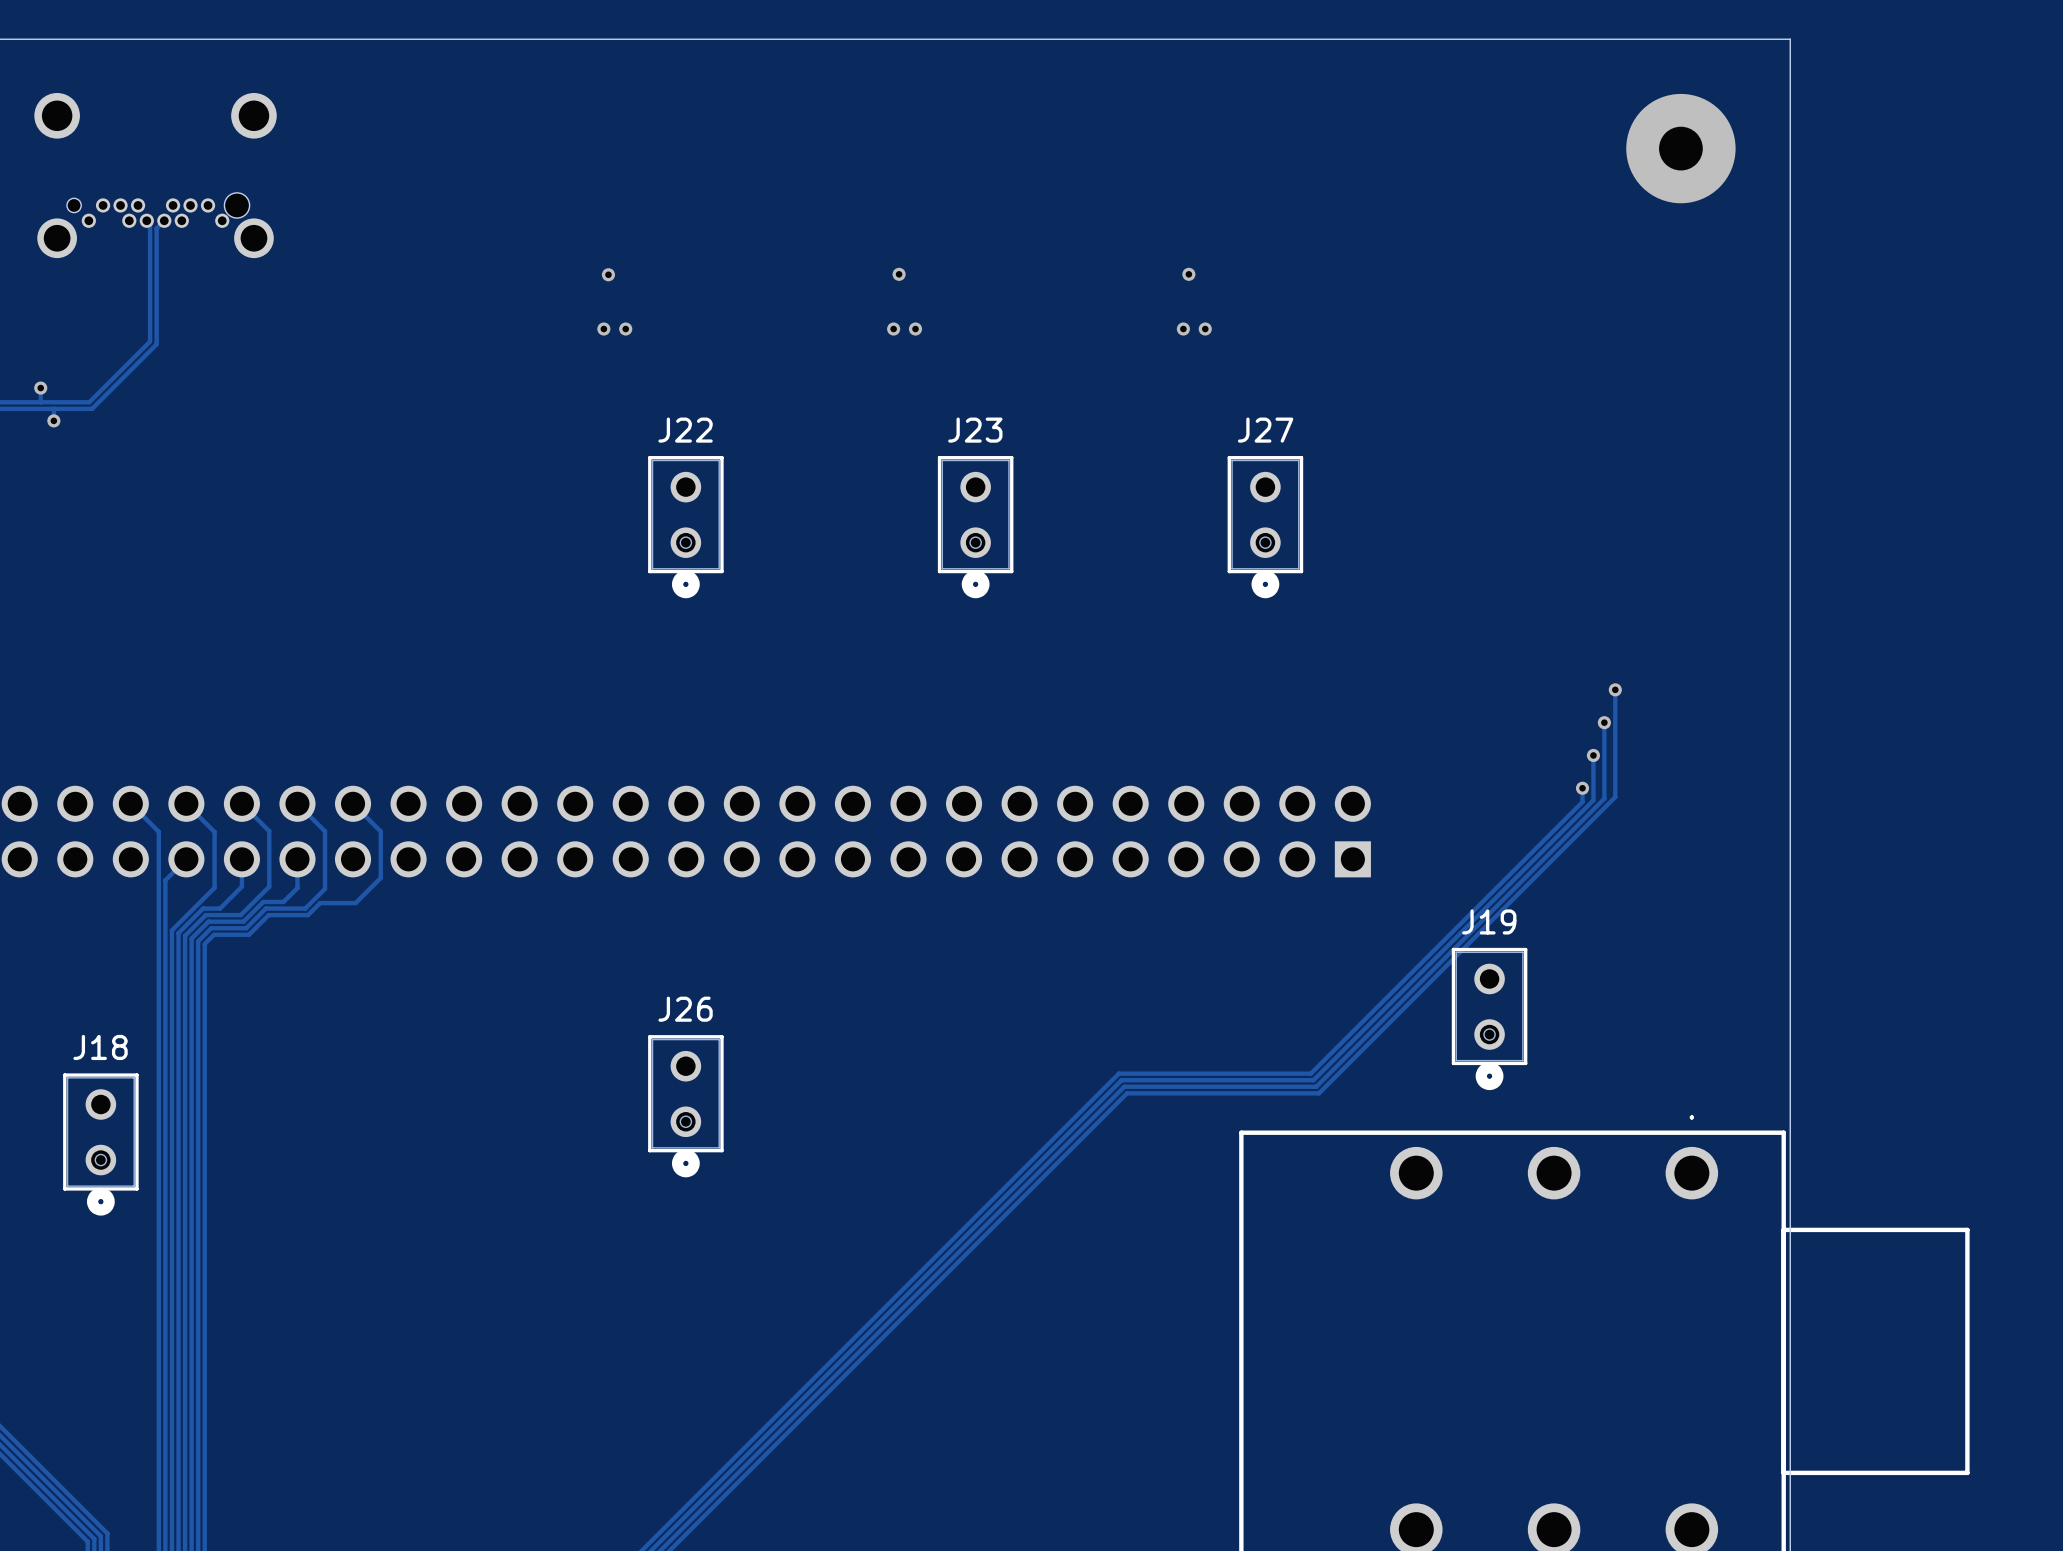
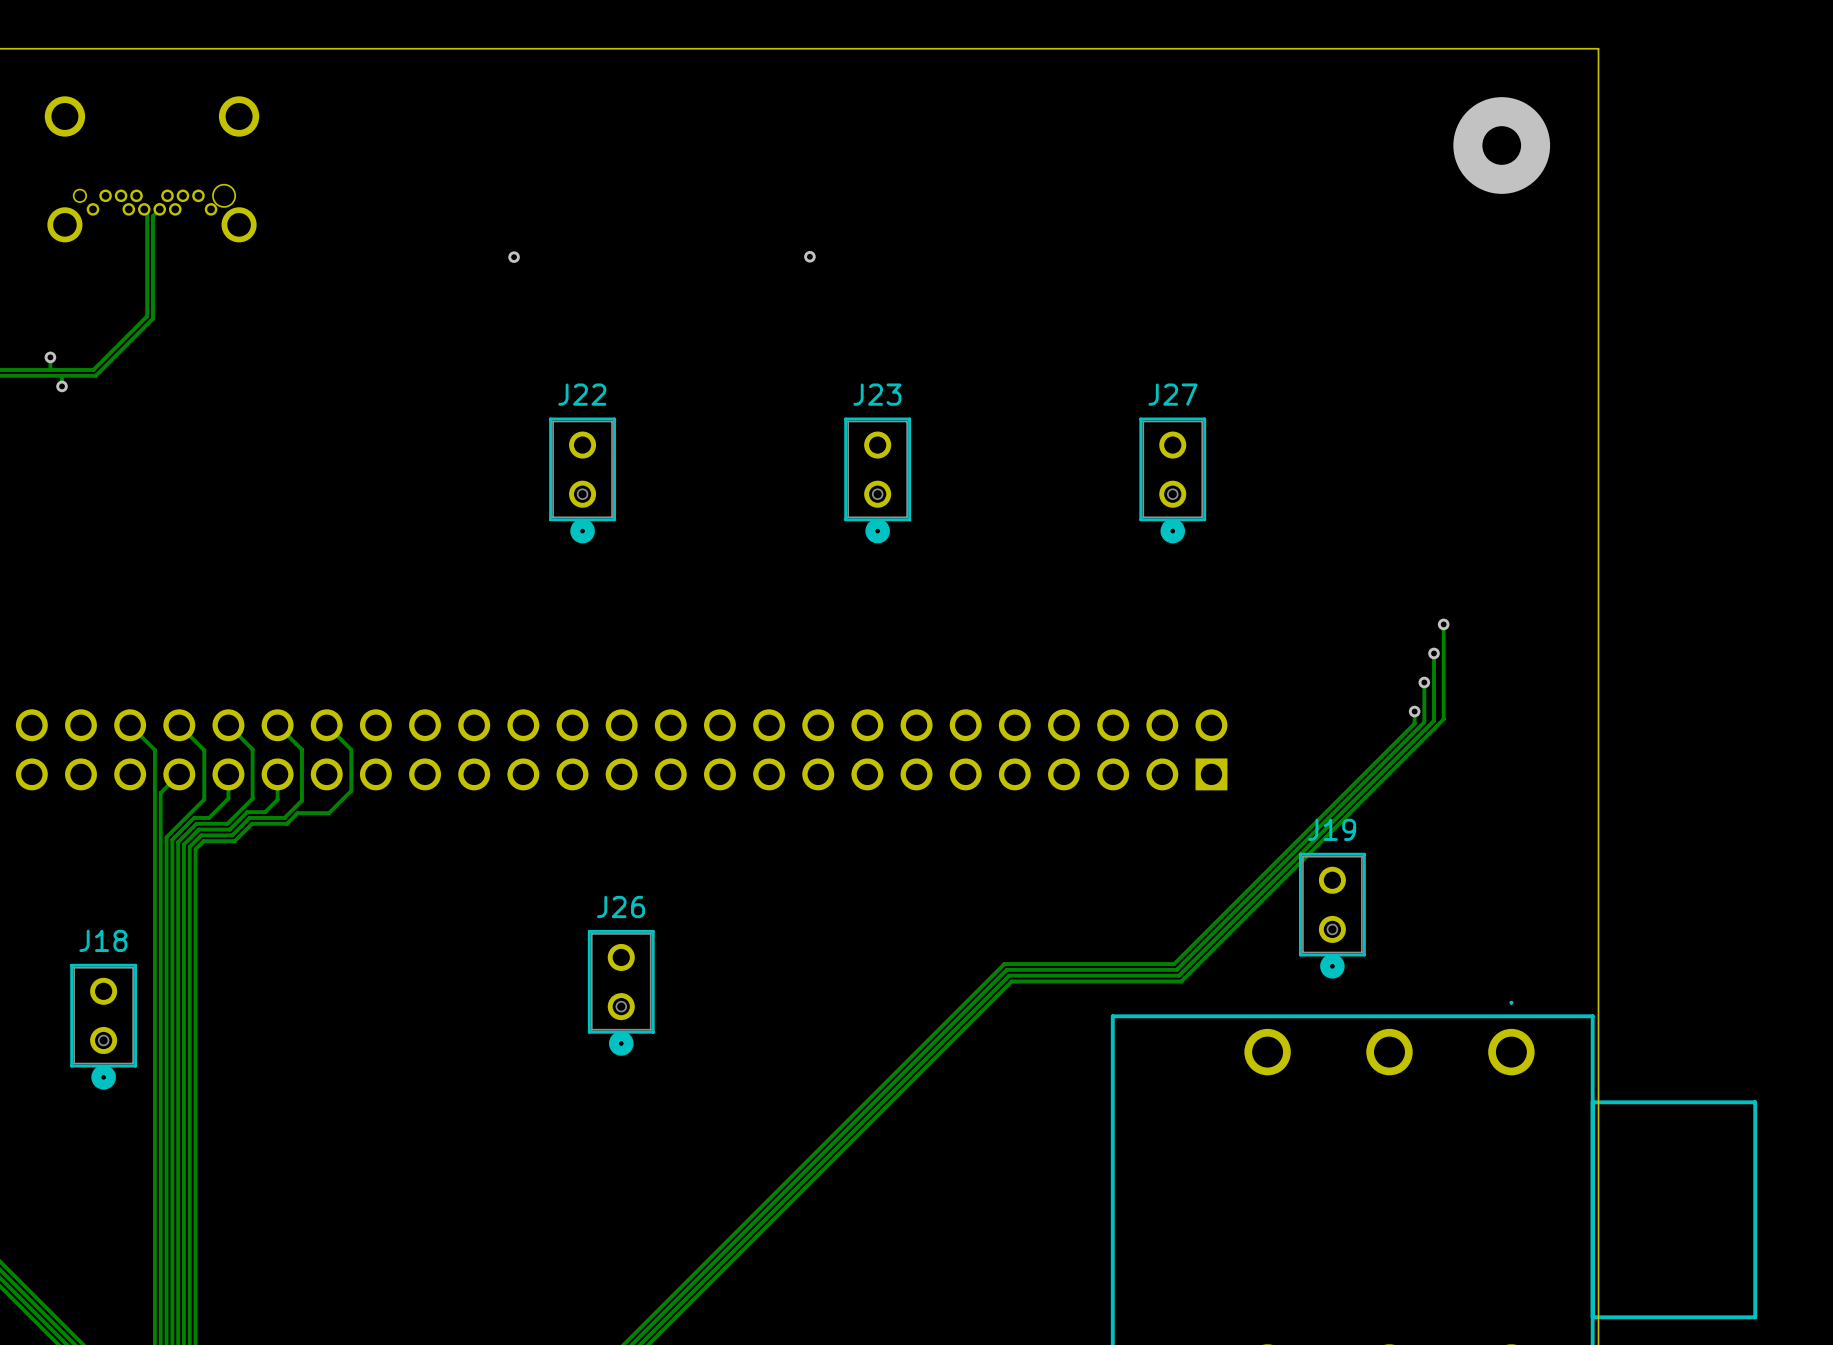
via: none -> (514, 257)
via: (608, 274) -> none
via: (1188, 274) -> none
via: (603, 329) -> none
via: (625, 329) -> none
via: (893, 329) -> none
via: (915, 329) -> none
via: (1183, 329) -> none
via: (1205, 329) -> none
J22 position: (685, 527) -> (582, 480)
J27 position: (1265, 527) -> (1172, 480)

